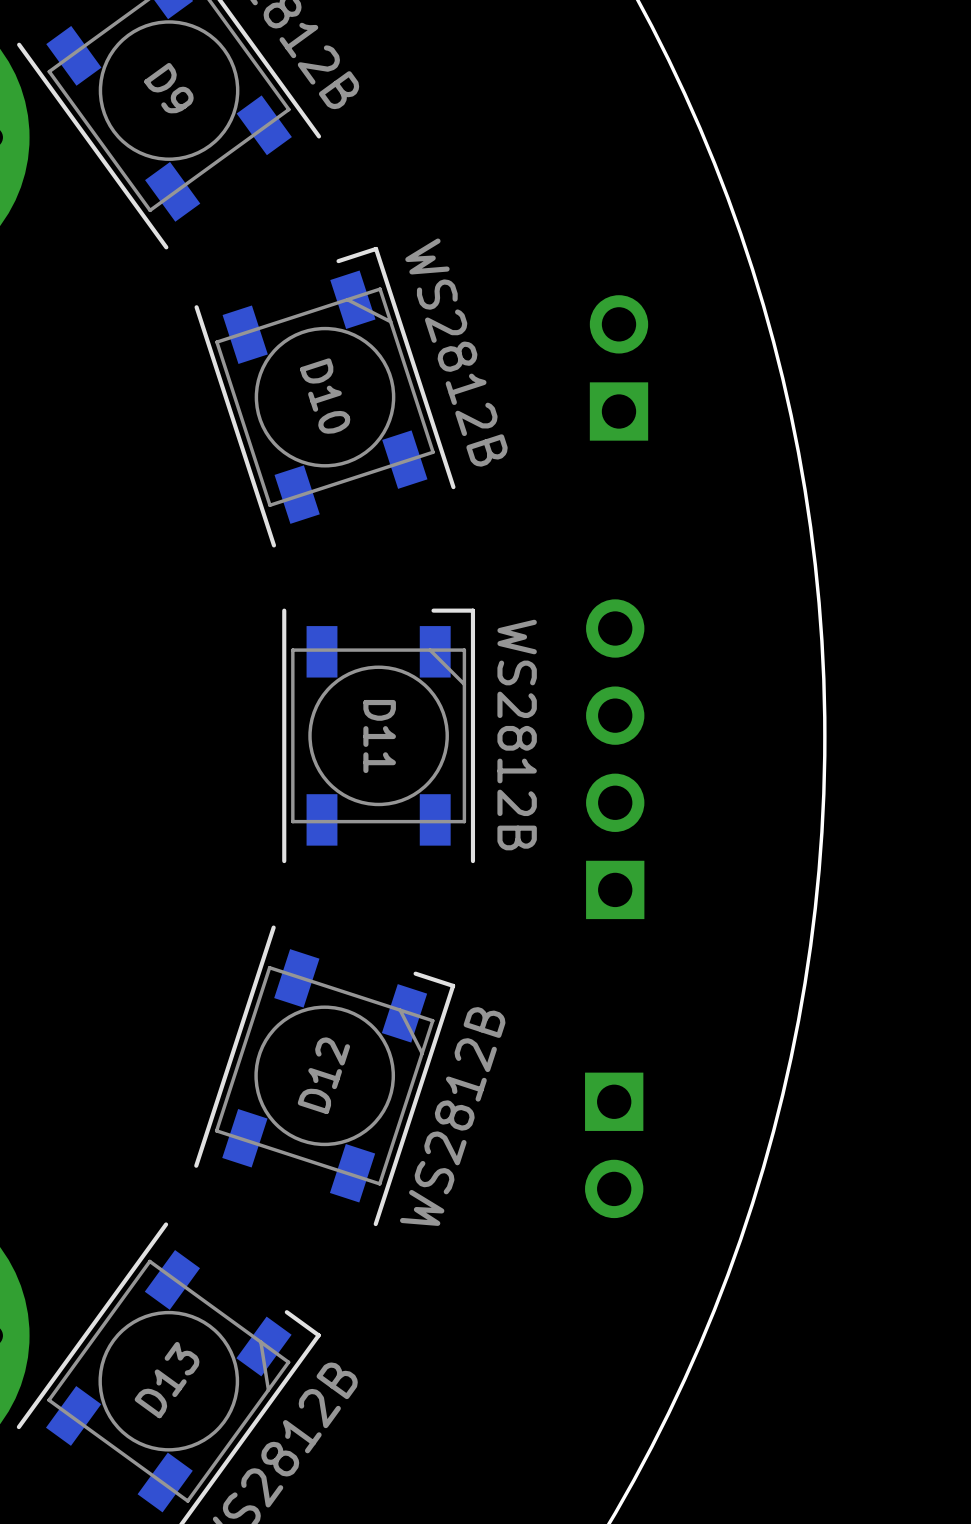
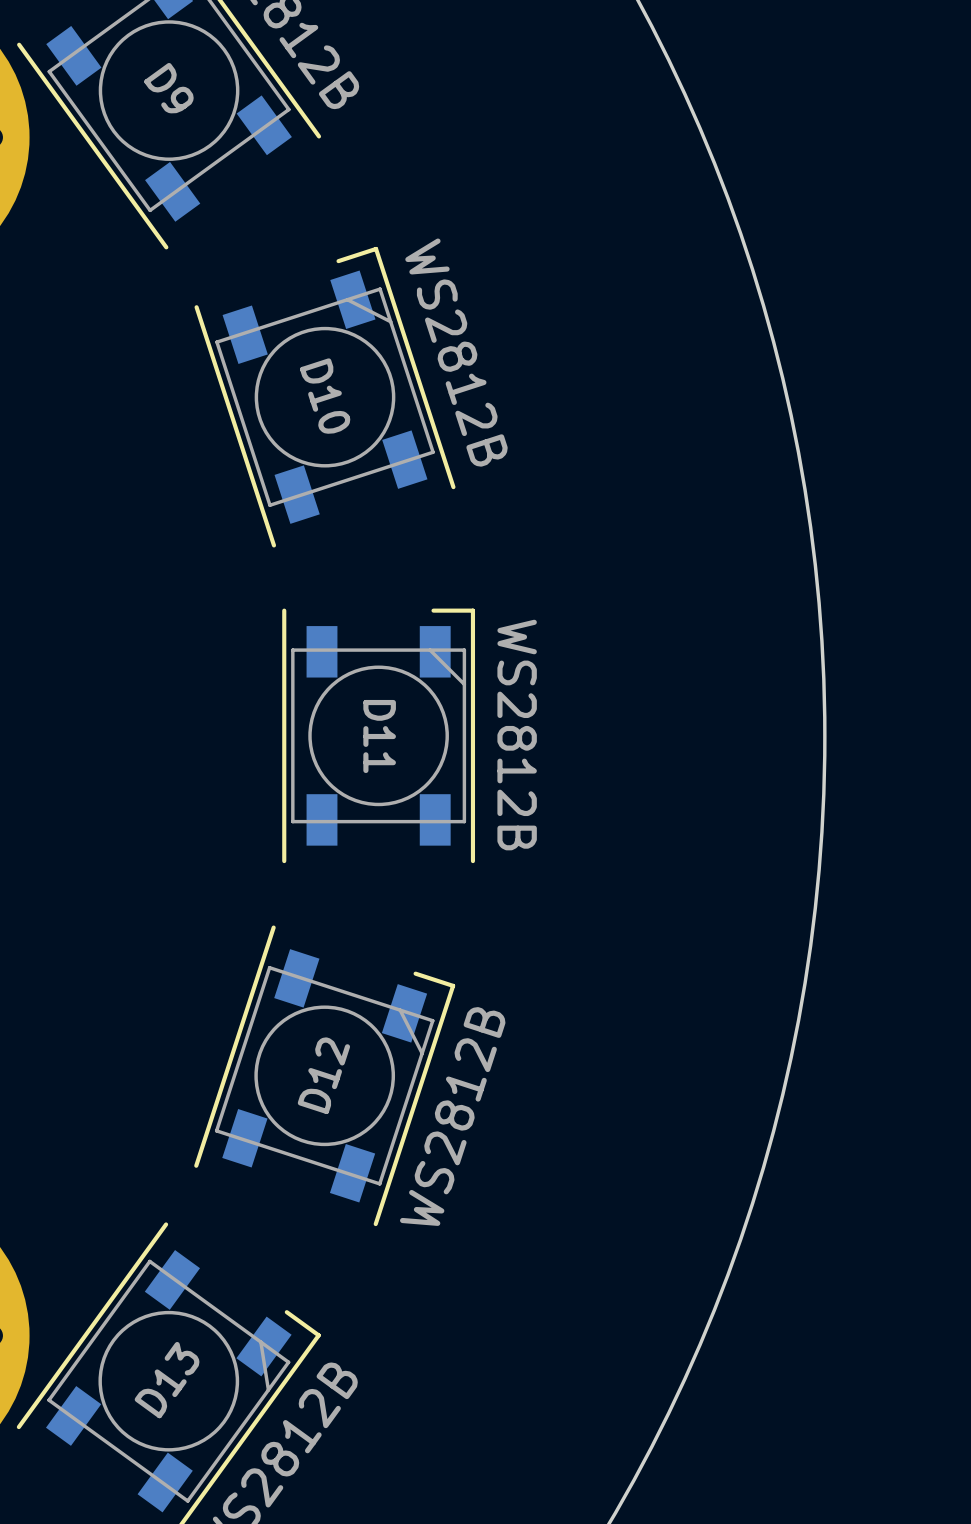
part: (618, 367) -> none
part: (615, 759) -> none
part: (614, 1145) -> none

